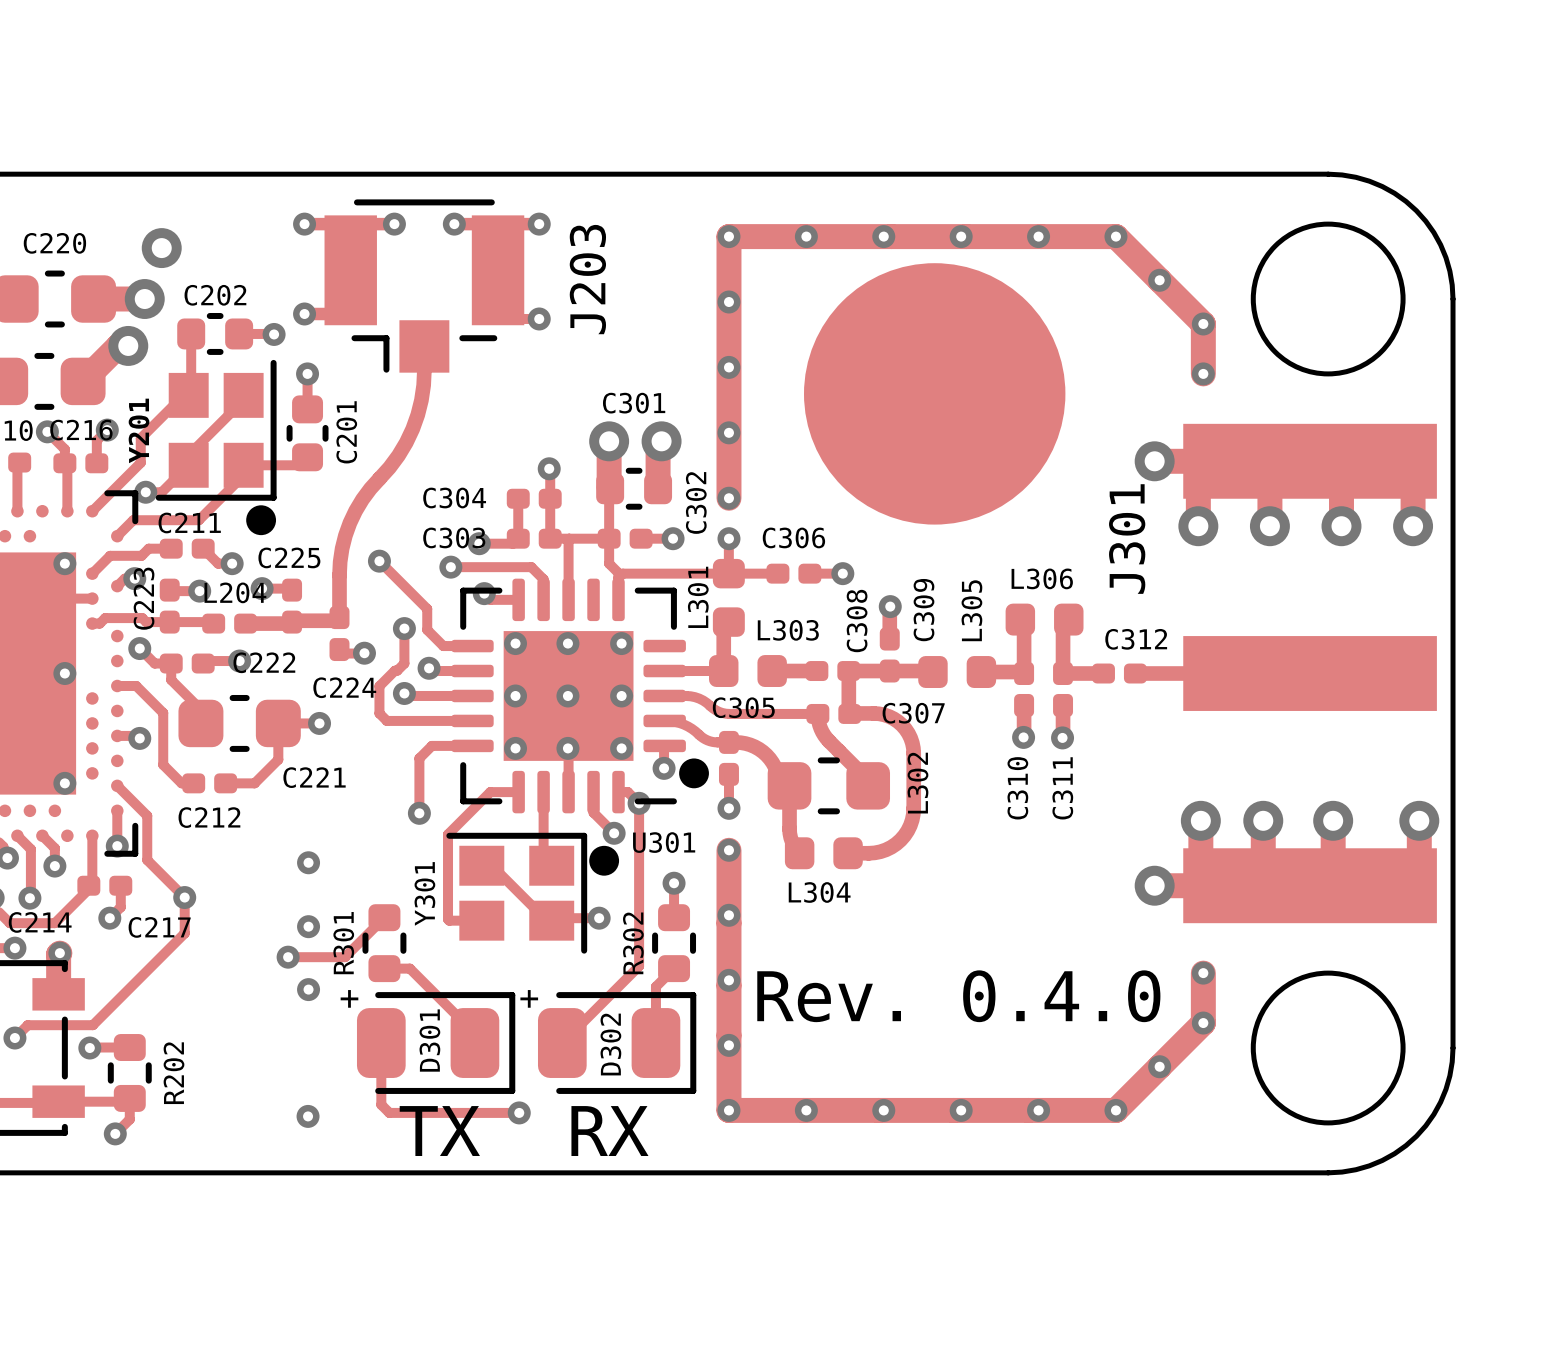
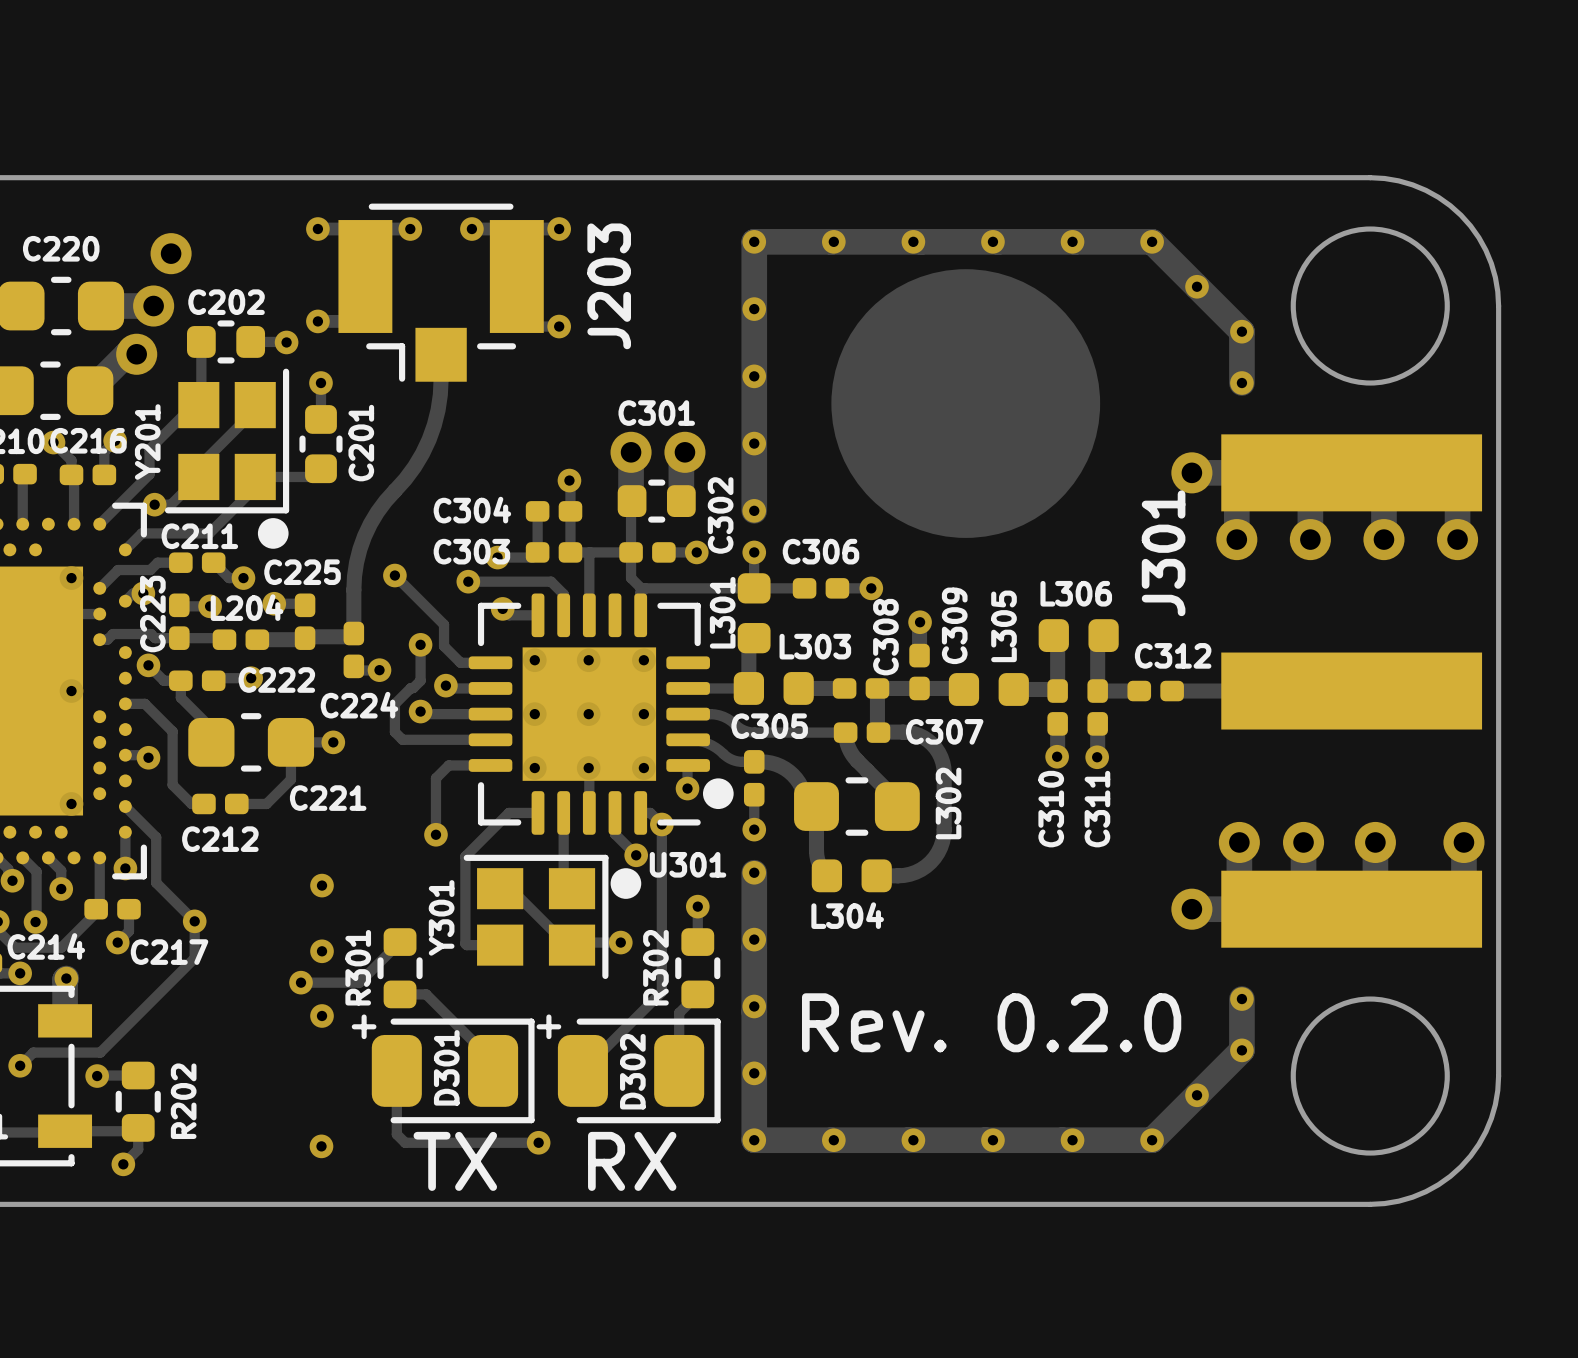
text: Rev. 0.4.0 (958, 996) -> Rev. 0.2.0 (991, 1022)

